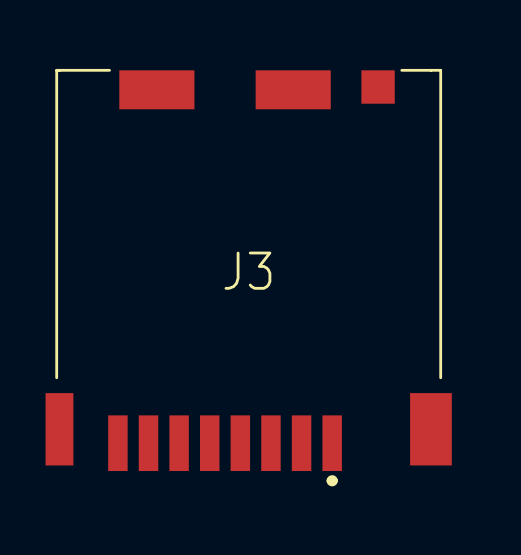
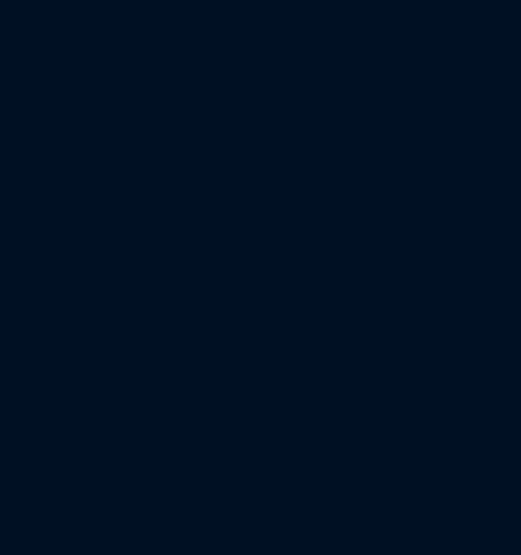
J3: (248, 277) -> none

